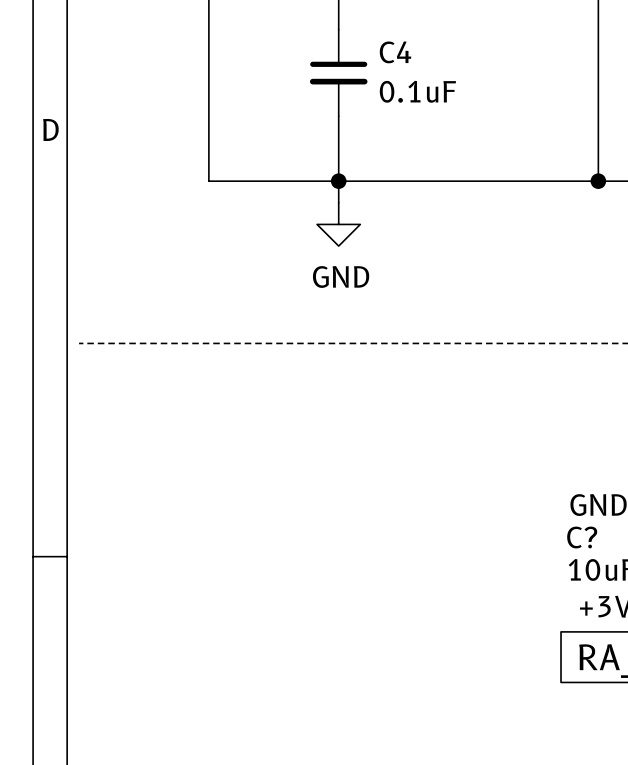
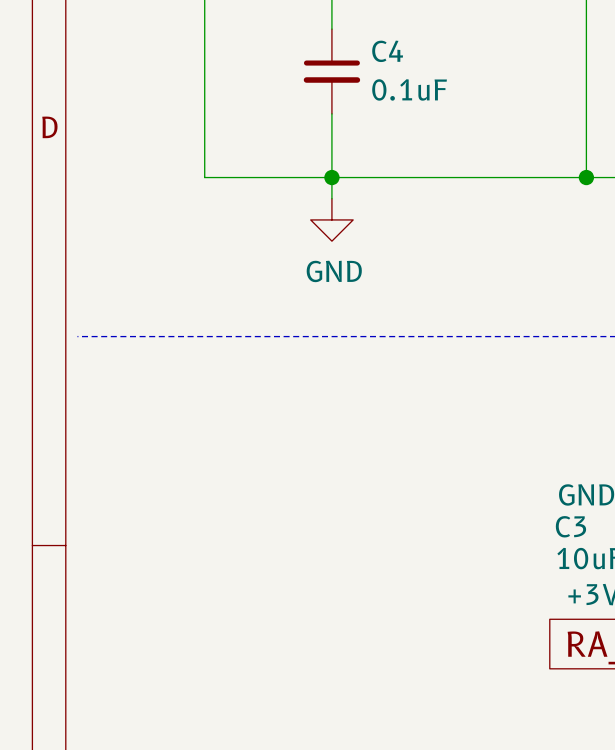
C? name: C? (582, 537) -> C3 (570, 526)

